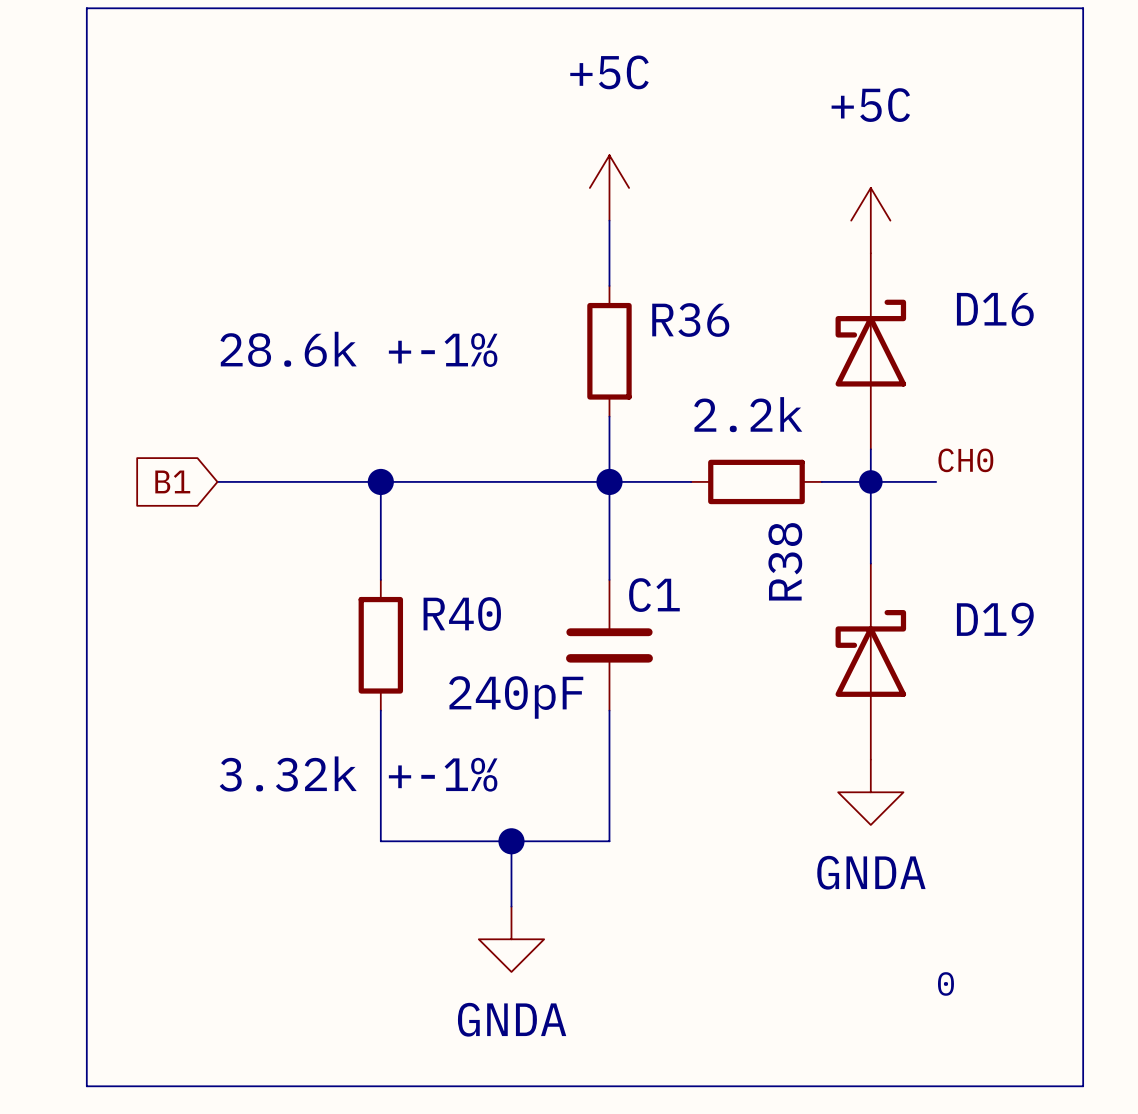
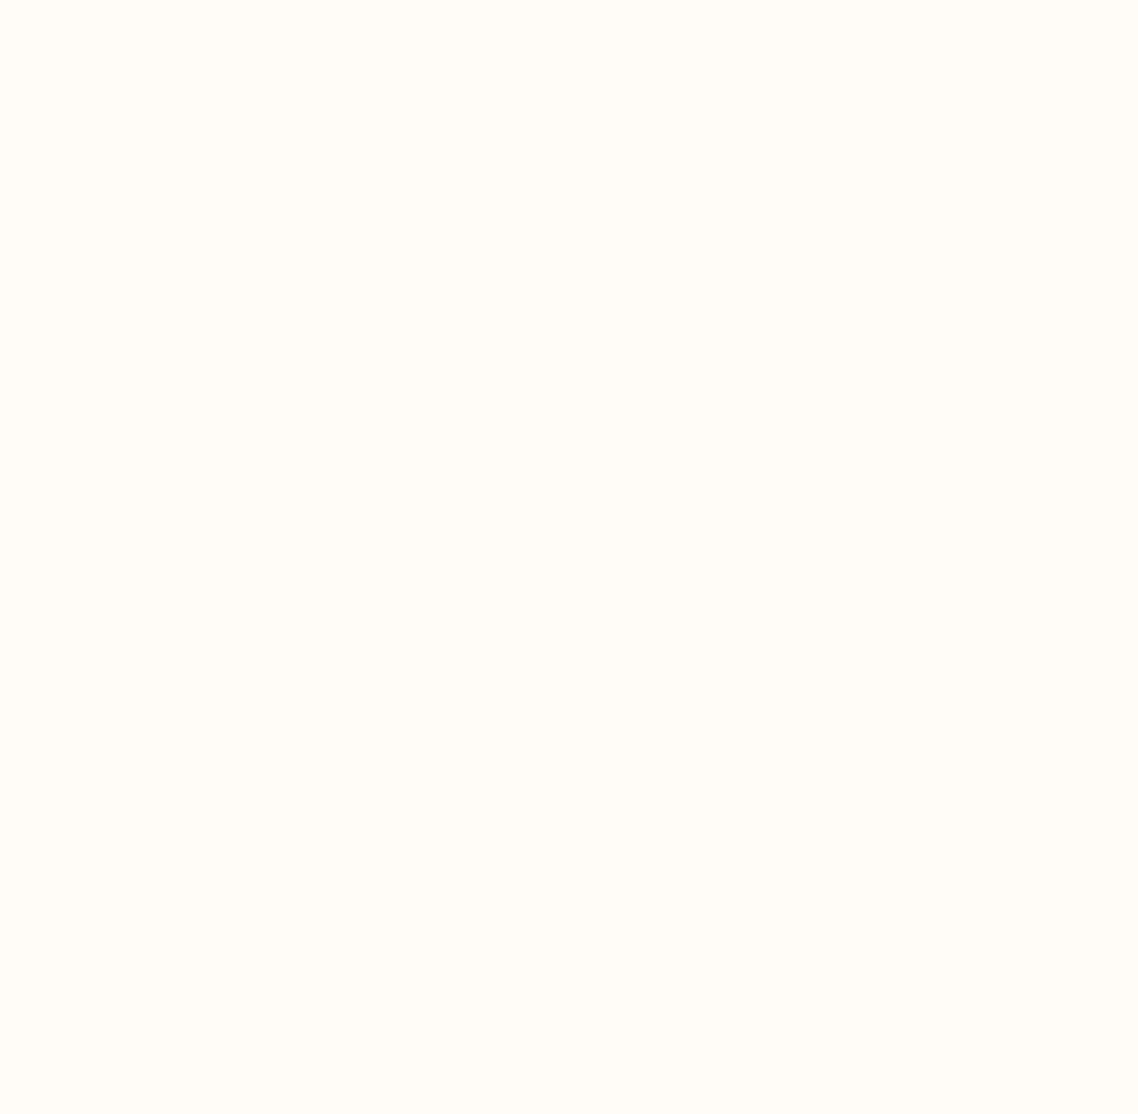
line: (86, 8) (1083, 8) (1083, 1086) (86, 1086) (86, 8) -> none
power symbol: +5C (609, 187) -> none
wire: (609, 220) (609, 285) -> none
power symbol: +5C (870, 220) -> none
R36: 28.6k +-1% (609, 351) -> none
D16: (870, 351) -> none
wire: (609, 416) (609, 579) -> none
wire: (870, 449) (870, 563) -> none
label: CH0 (965, 460) -> none
global label: B1 (172, 481) -> none
wire: (217, 481) (691, 481) -> none
wire: (380, 481) (380, 579) -> none
junction: (380, 481) -> none
junction: (609, 481) -> none
R38: 2.2k (756, 481) -> none
wire: (821, 481) (936, 481) -> none
junction: (870, 481) -> none
R40: 3.32k +-1% (380, 645) -> none
C1: 240pF (609, 645) -> none
D19: (870, 661) -> none
wire: (380, 710) (380, 841) (609, 841) (609, 710) -> none
power symbol: GNDA (870, 792) -> none
wire: (511, 841) (511, 906) -> none
junction: (511, 841) -> none
power symbol: GNDA (511, 939) -> none
text: 0 (945, 983) -> none

